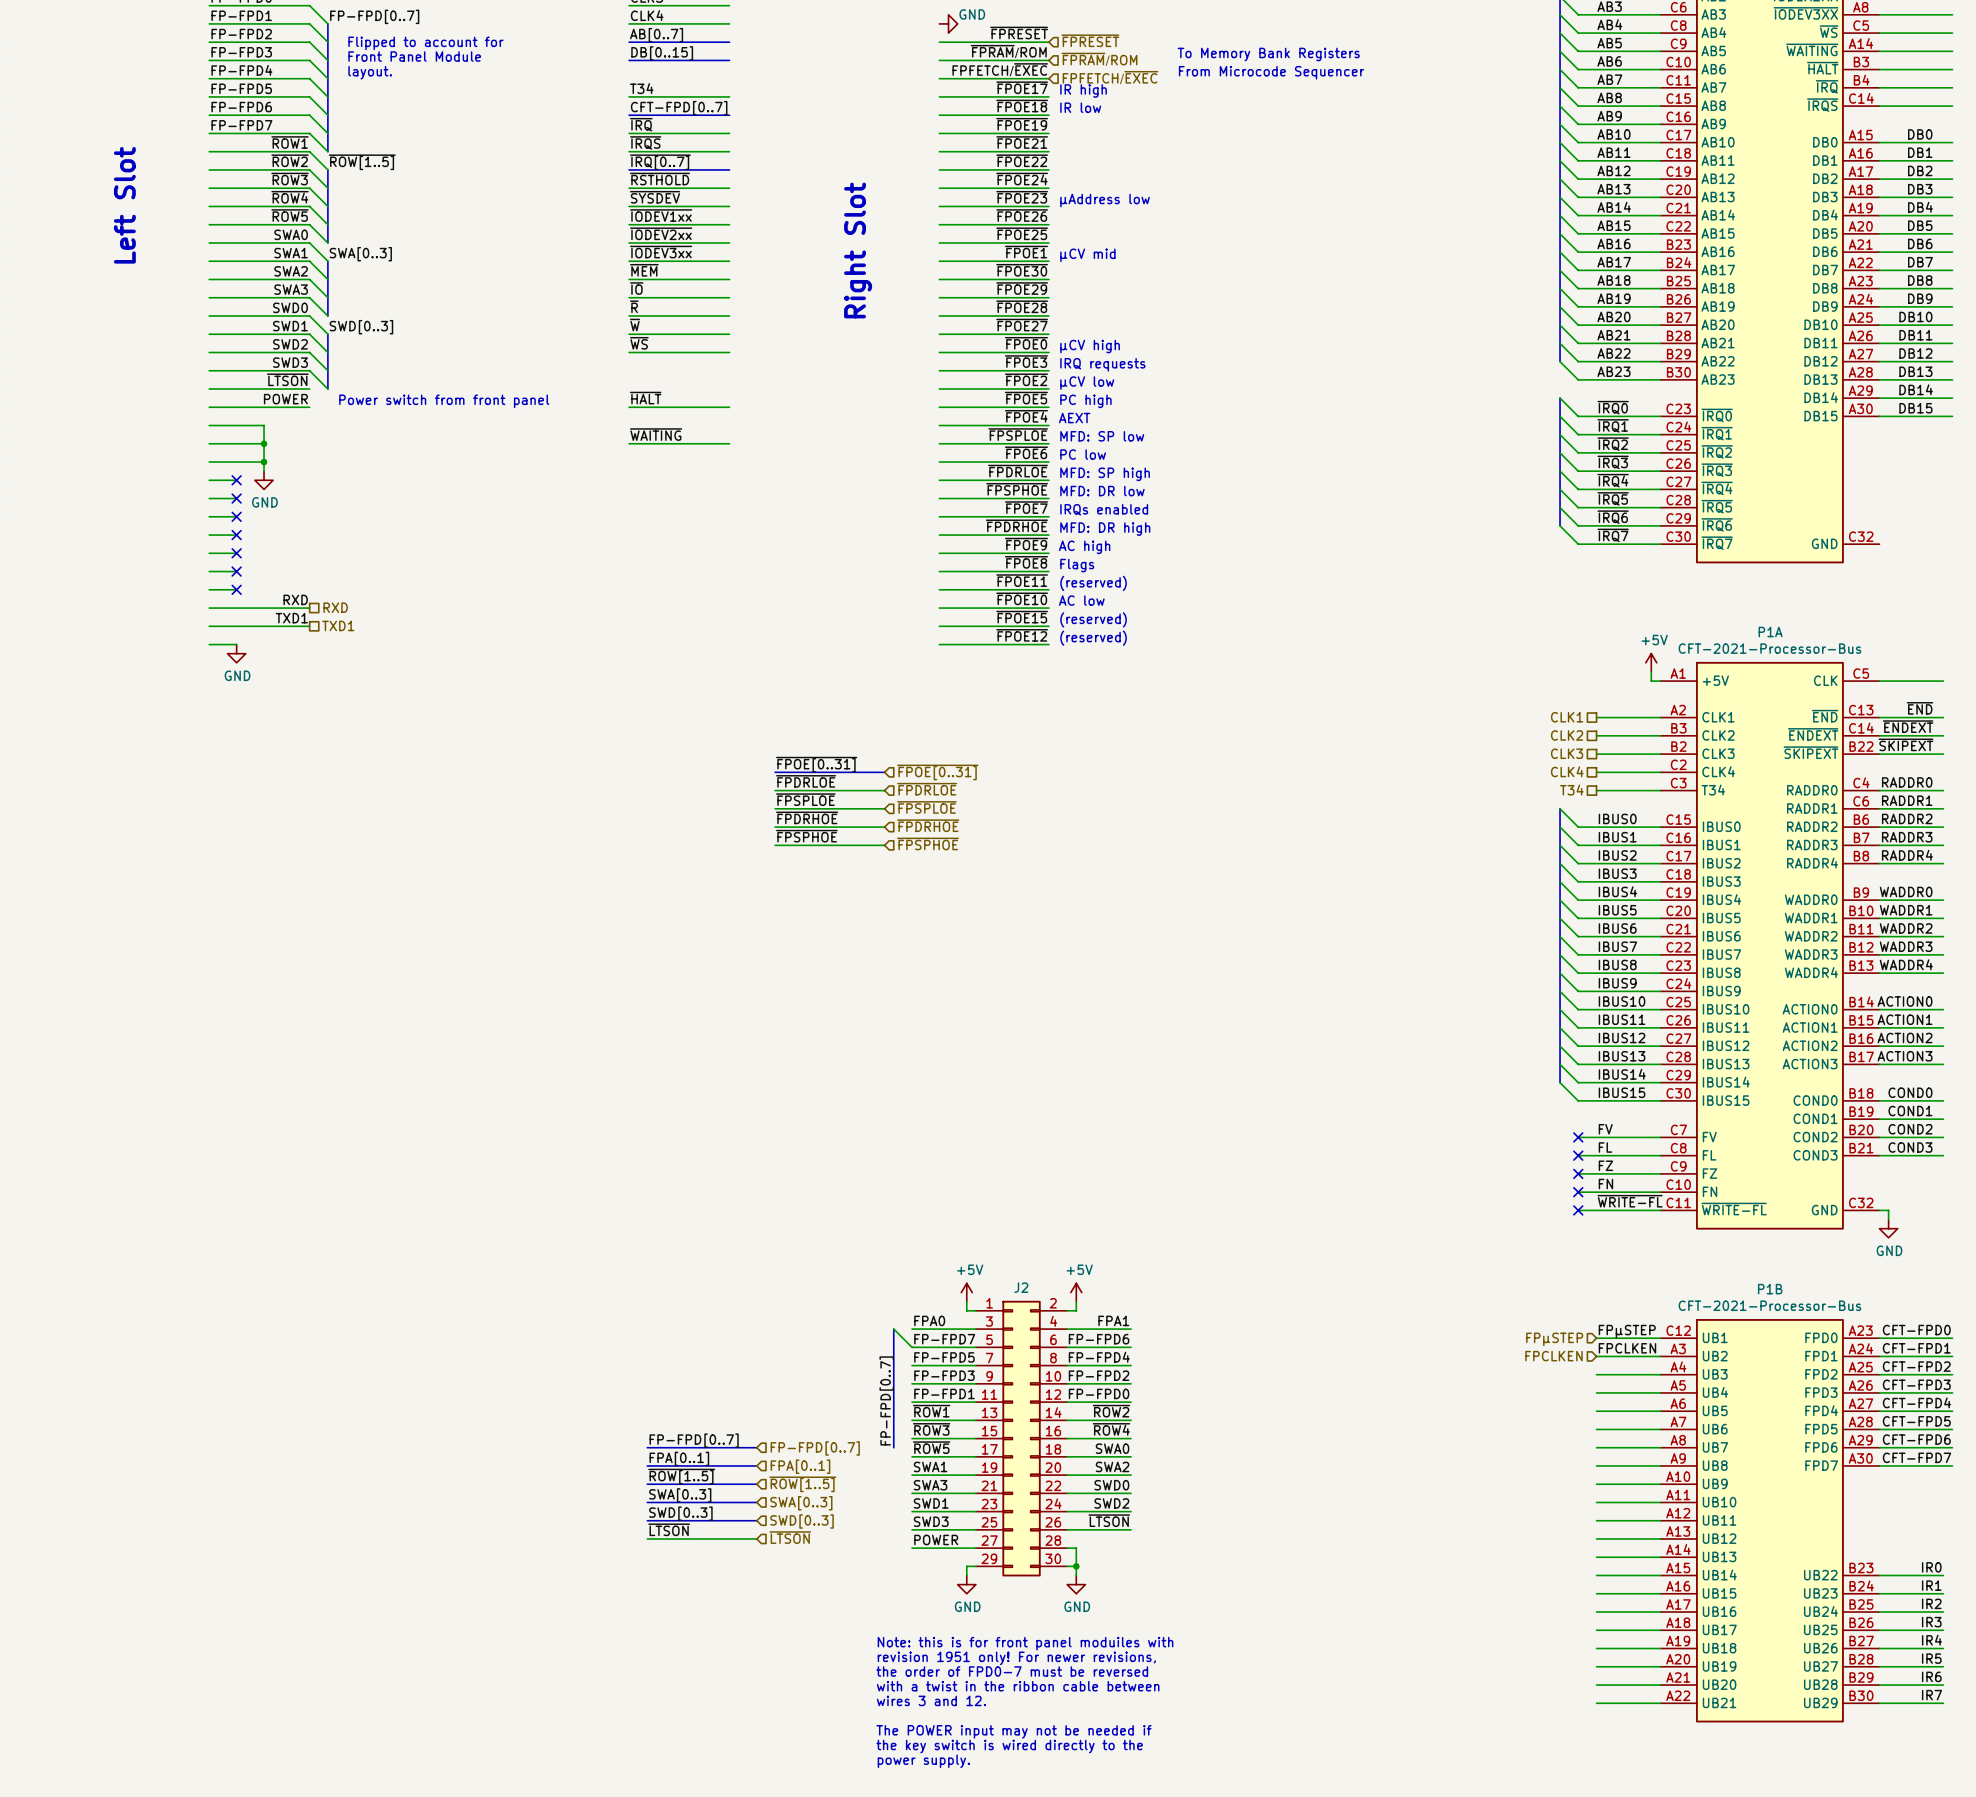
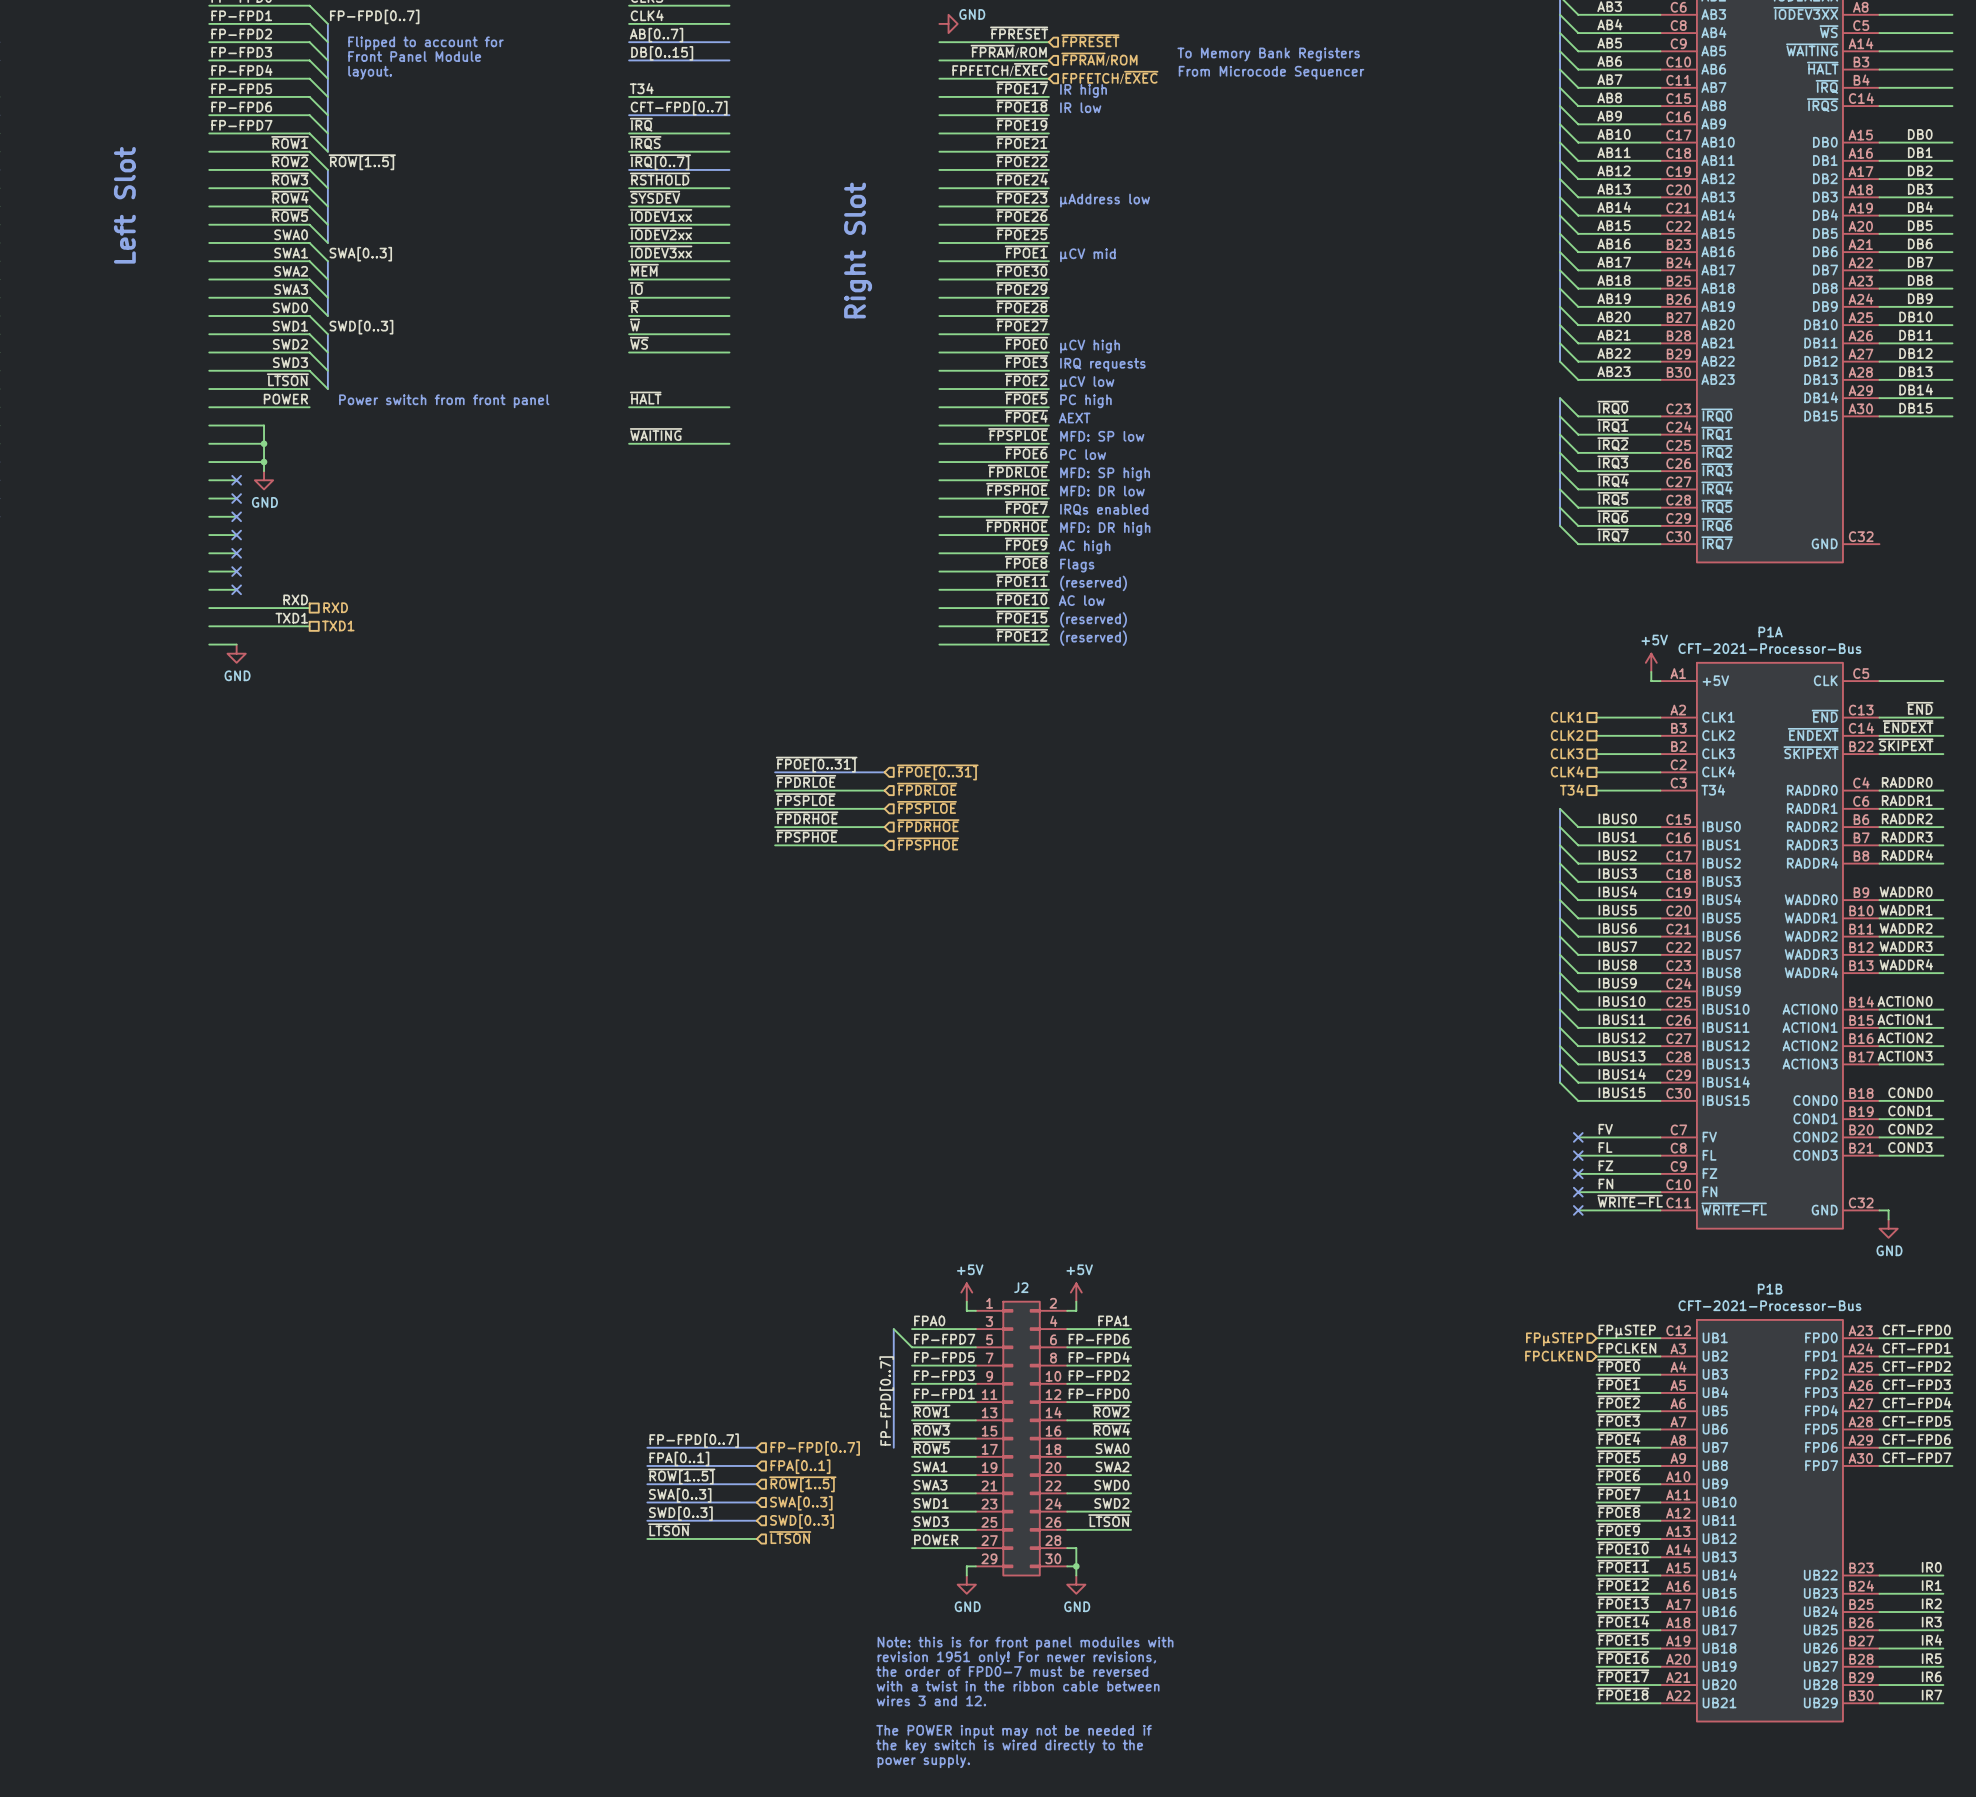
label: none -> ~{FPOE0} (1618, 1365)
label: none -> ~{FPOE1} (1618, 1383)
label: none -> ~{FPOE2} (1618, 1402)
label: none -> ~{FPOE3} (1618, 1420)
label: none -> ~{FPOE4} (1618, 1438)
label: none -> ~{FPOE5} (1618, 1456)
label: none -> ~{FPOE6} (1618, 1475)
label: none -> ~{FPOE7} (1618, 1493)
label: none -> ~{FPOE8} (1618, 1511)
label: none -> ~{FPOE9} (1618, 1529)
label: none -> ~{FPOE10} (1623, 1548)
label: none -> ~{FPOE11} (1623, 1566)
label: none -> ~{FPOE12} (1623, 1584)
label: none -> ~{FPOE13} (1623, 1602)
label: none -> ~{FPOE14} (1623, 1621)
label: none -> ~{FPOE15} (1623, 1639)
label: none -> ~{FPOE16} (1623, 1657)
label: none -> ~{FPOE17} (1623, 1675)
label: none -> ~{FPOE18} (1623, 1694)

